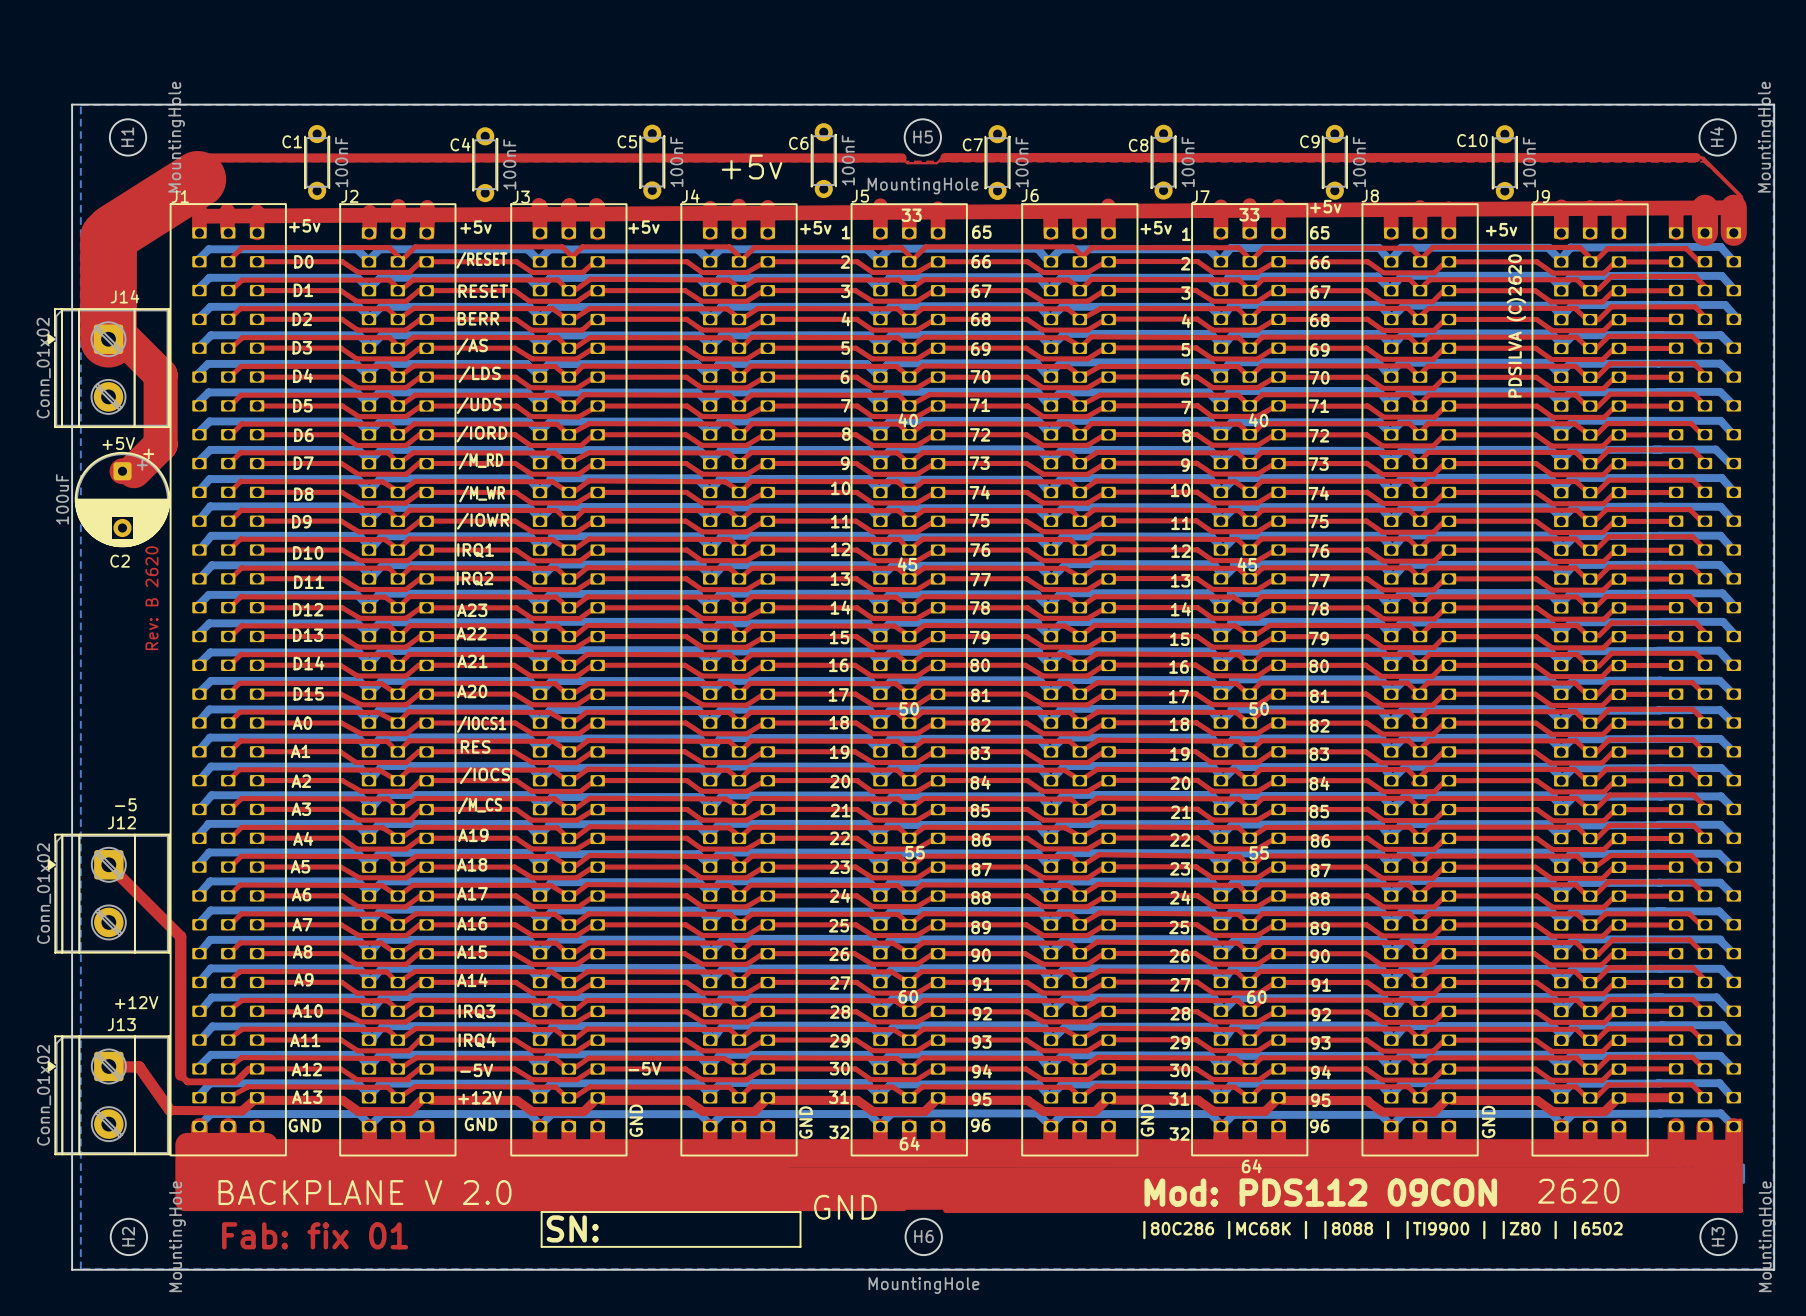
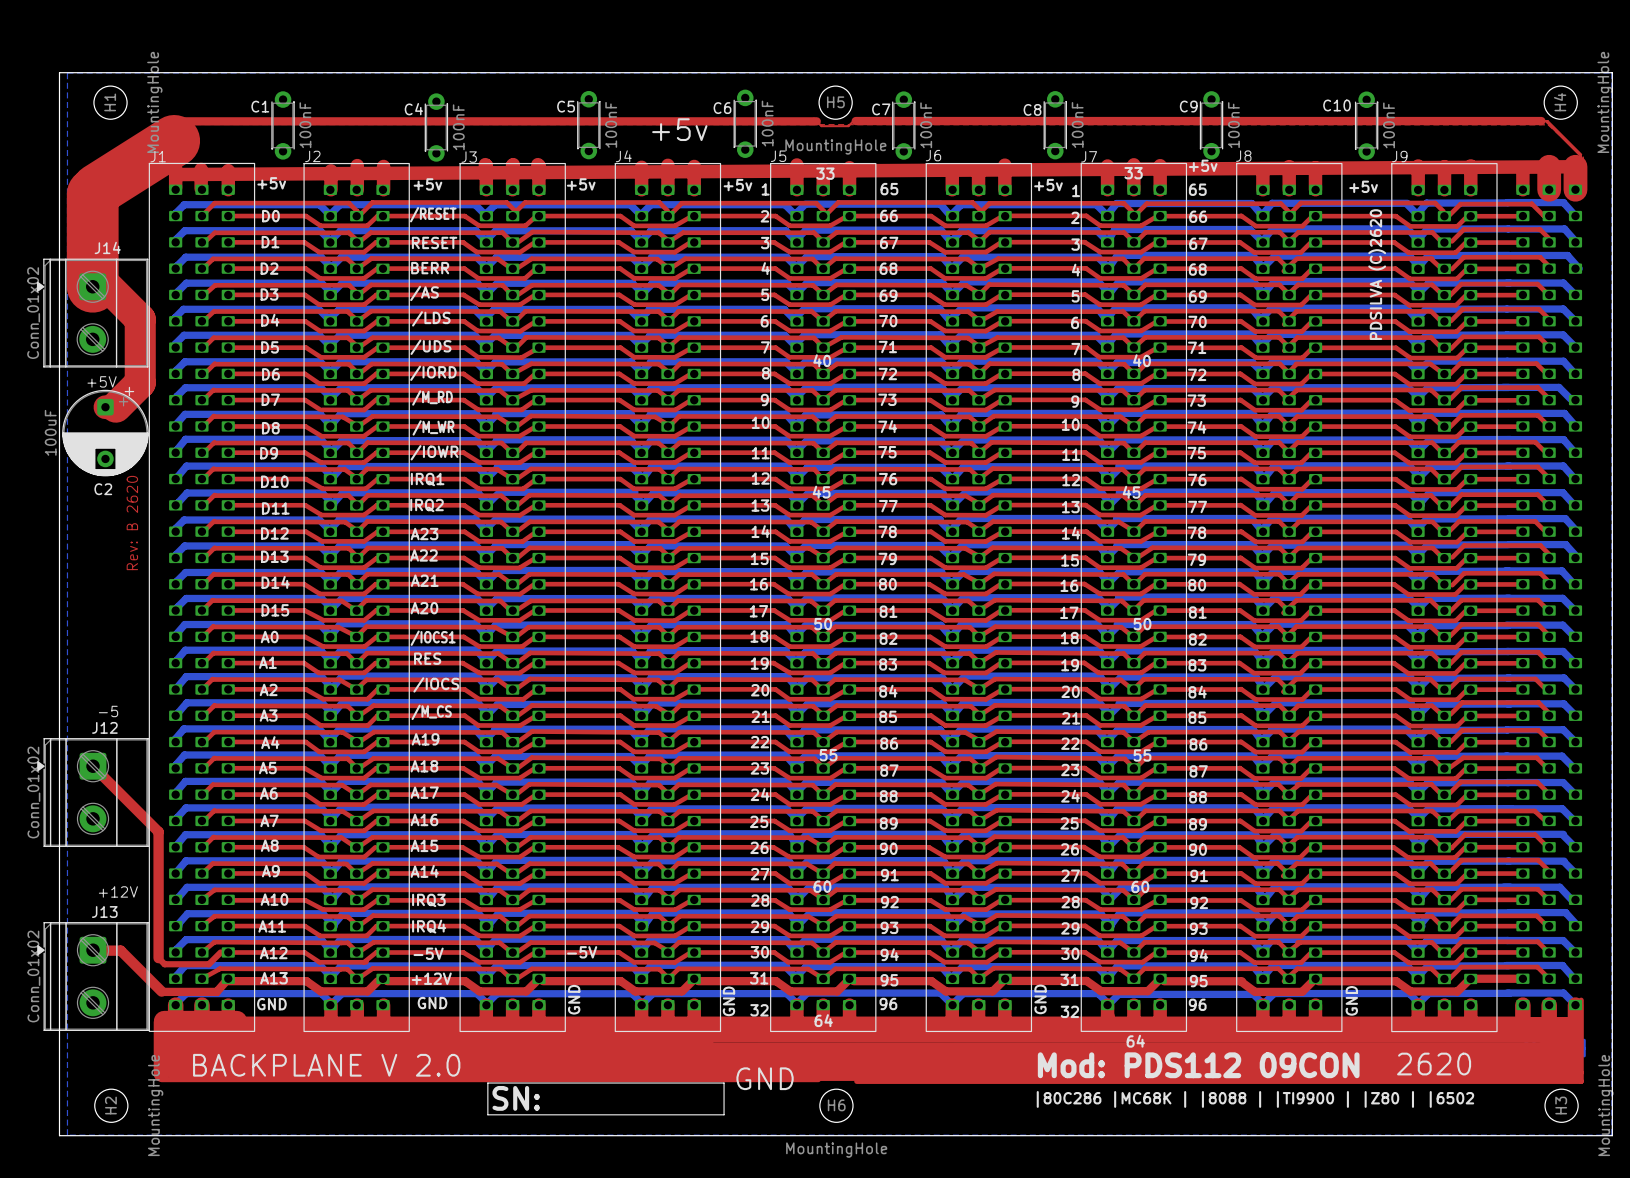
top track: (139, 1066) (169, 1110) (242, 1110) (257, 1097) -> (162, 991) (216, 991) (228, 978)
top track: none -> (120, 950) (161, 991)
text: Fab: fix 01 (315, 1235) -> none

